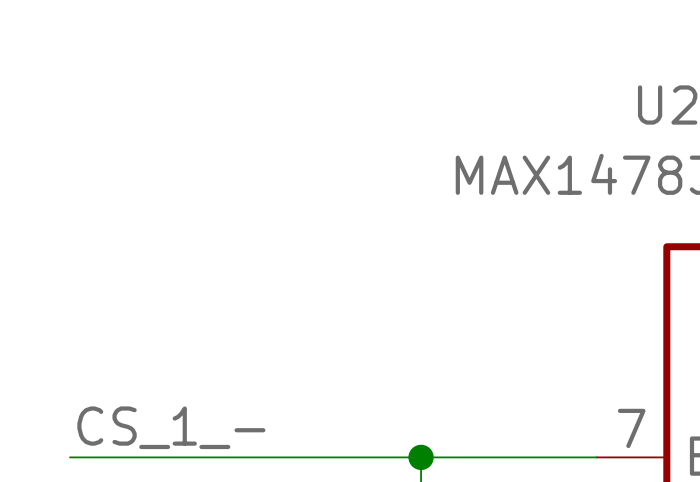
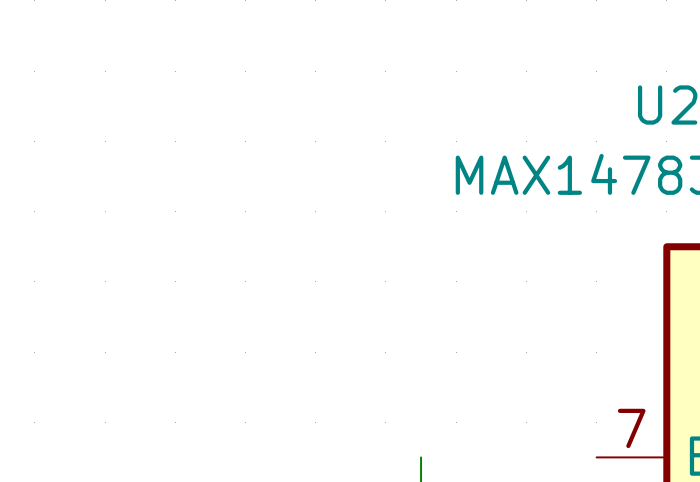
label: CS_1_- (171, 427) -> none
wire: (69, 457) (596, 457) -> none
junction: (421, 457) -> none

